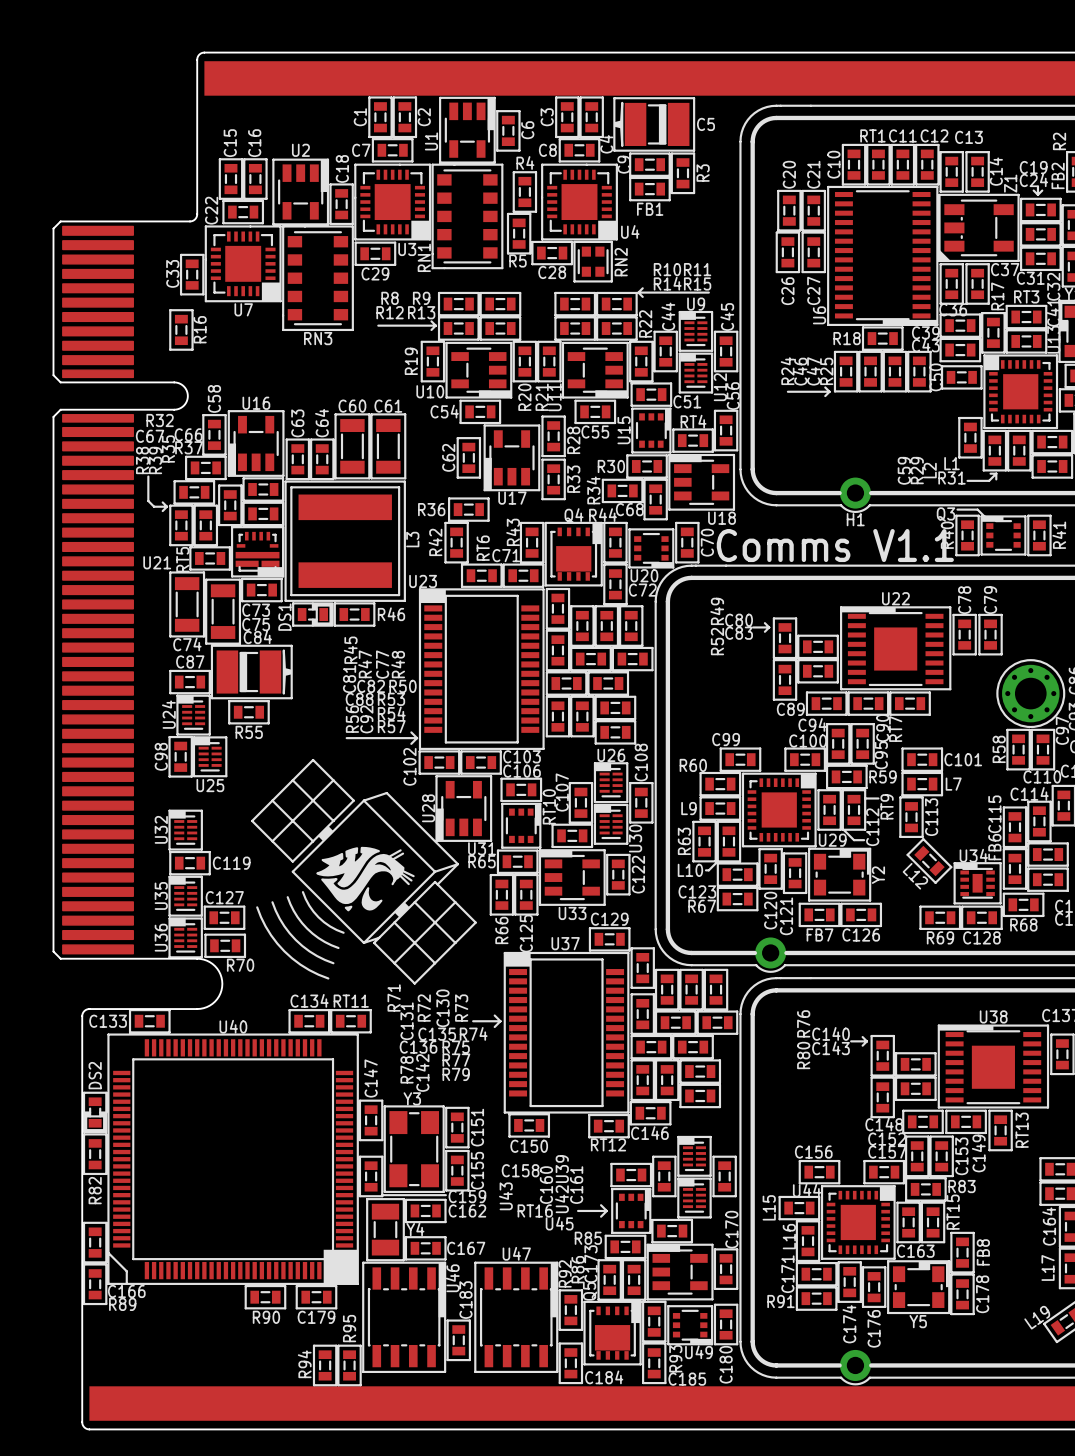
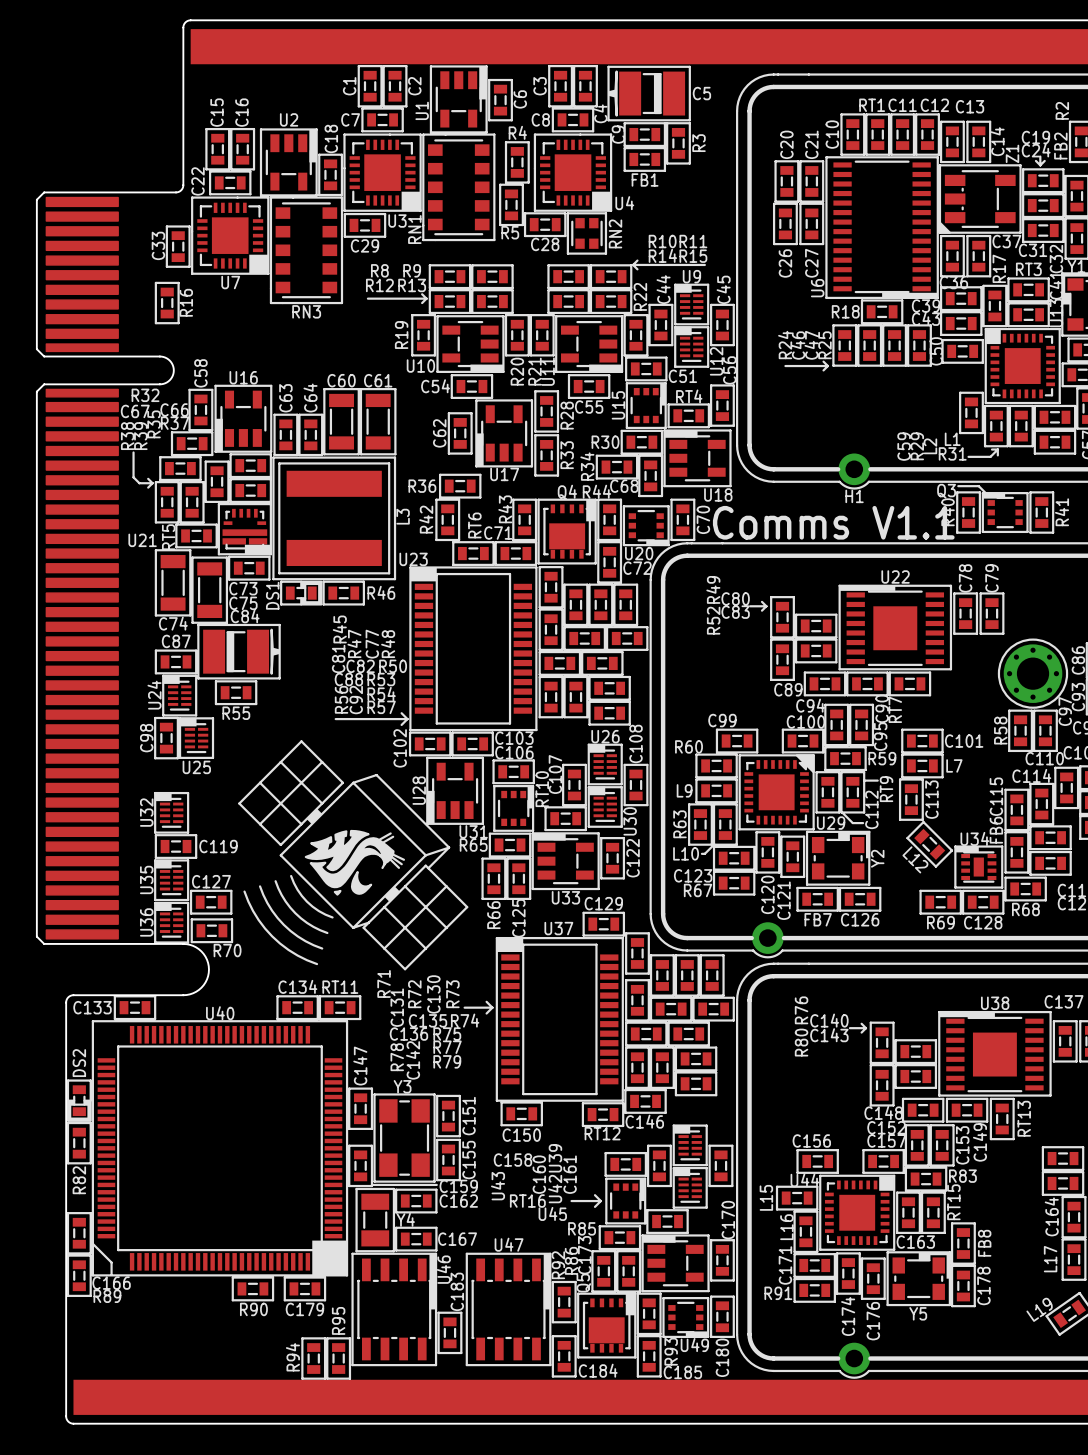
U29 footprint: [741, 772, 817, 848] -> [738, 754, 815, 831]

